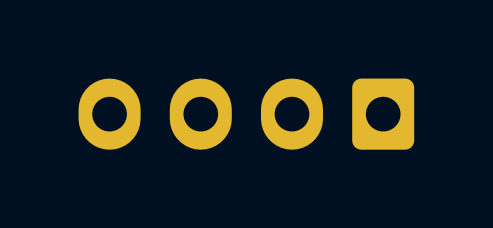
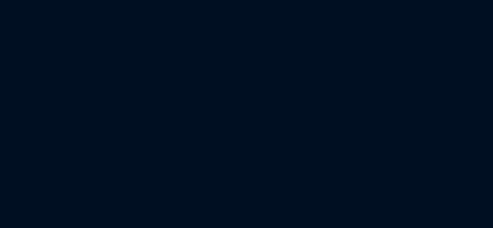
part: (246, 114) -> none

